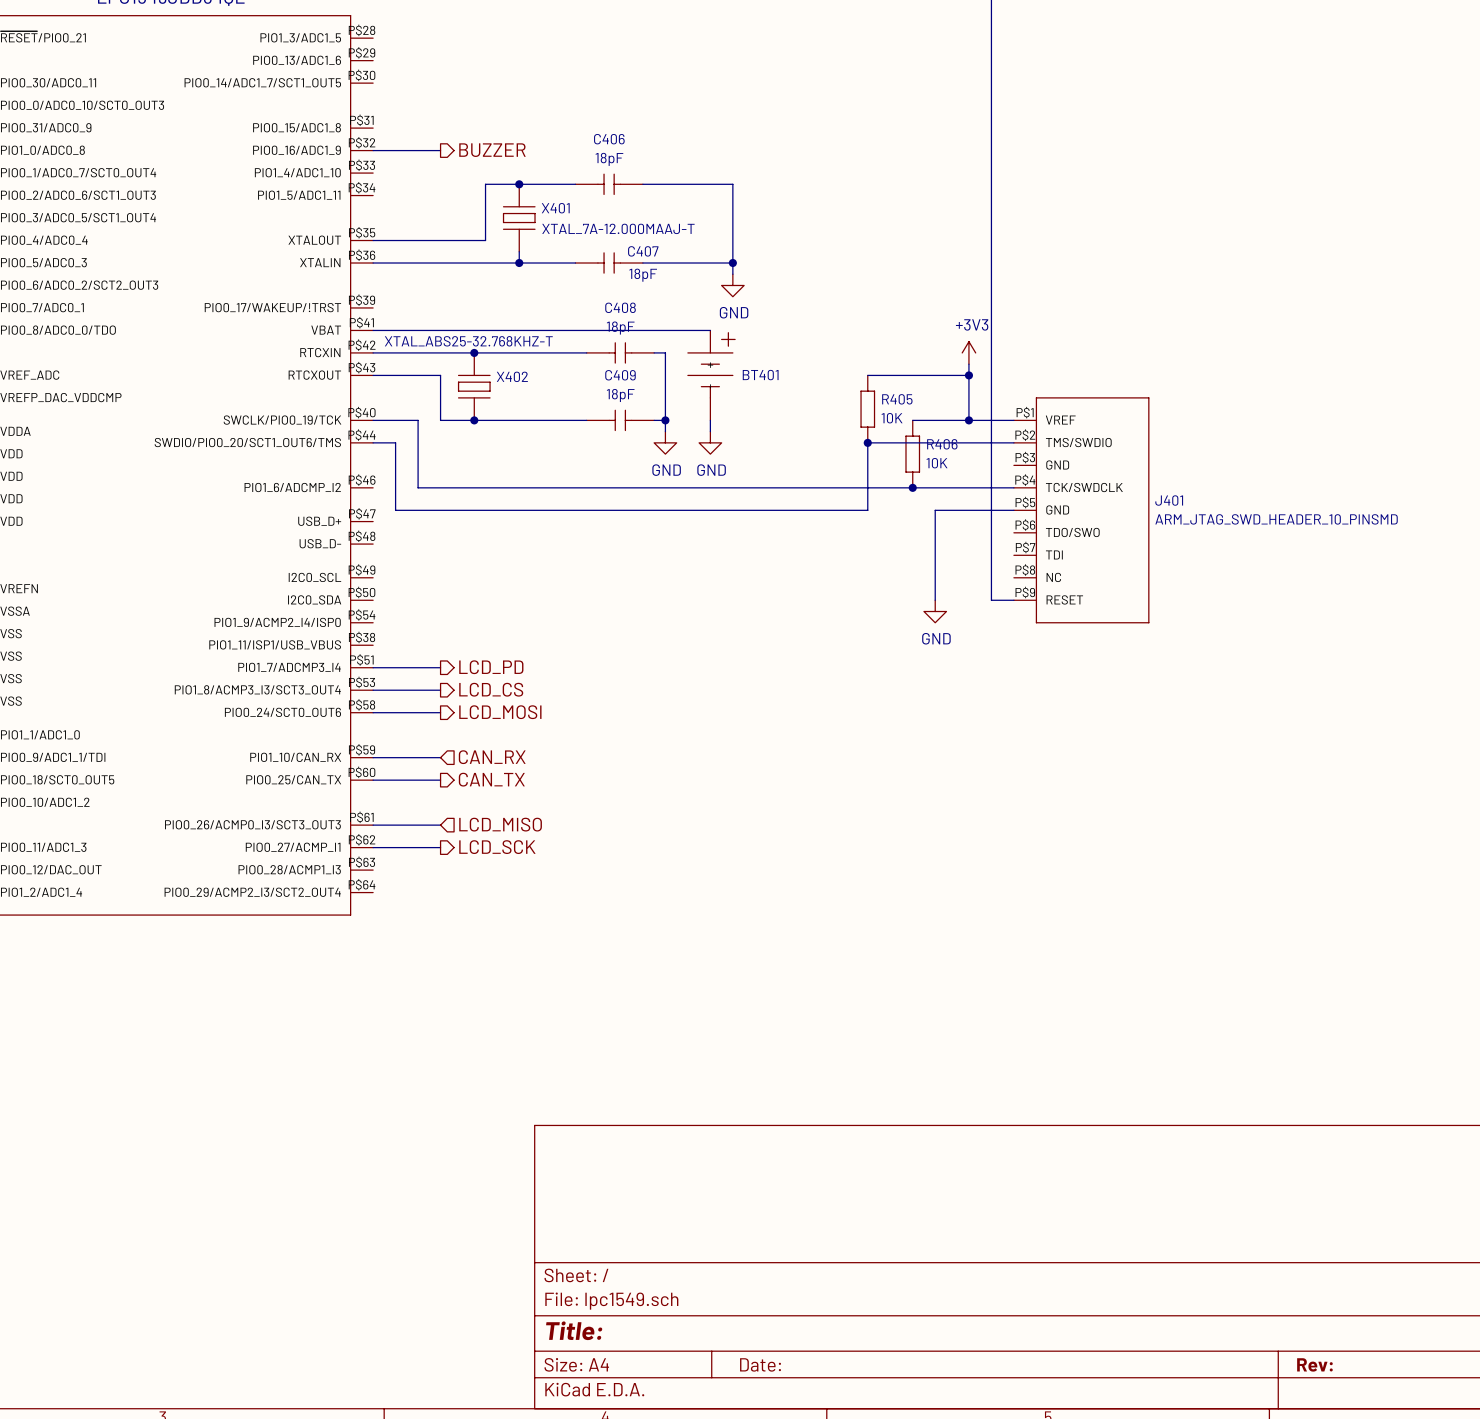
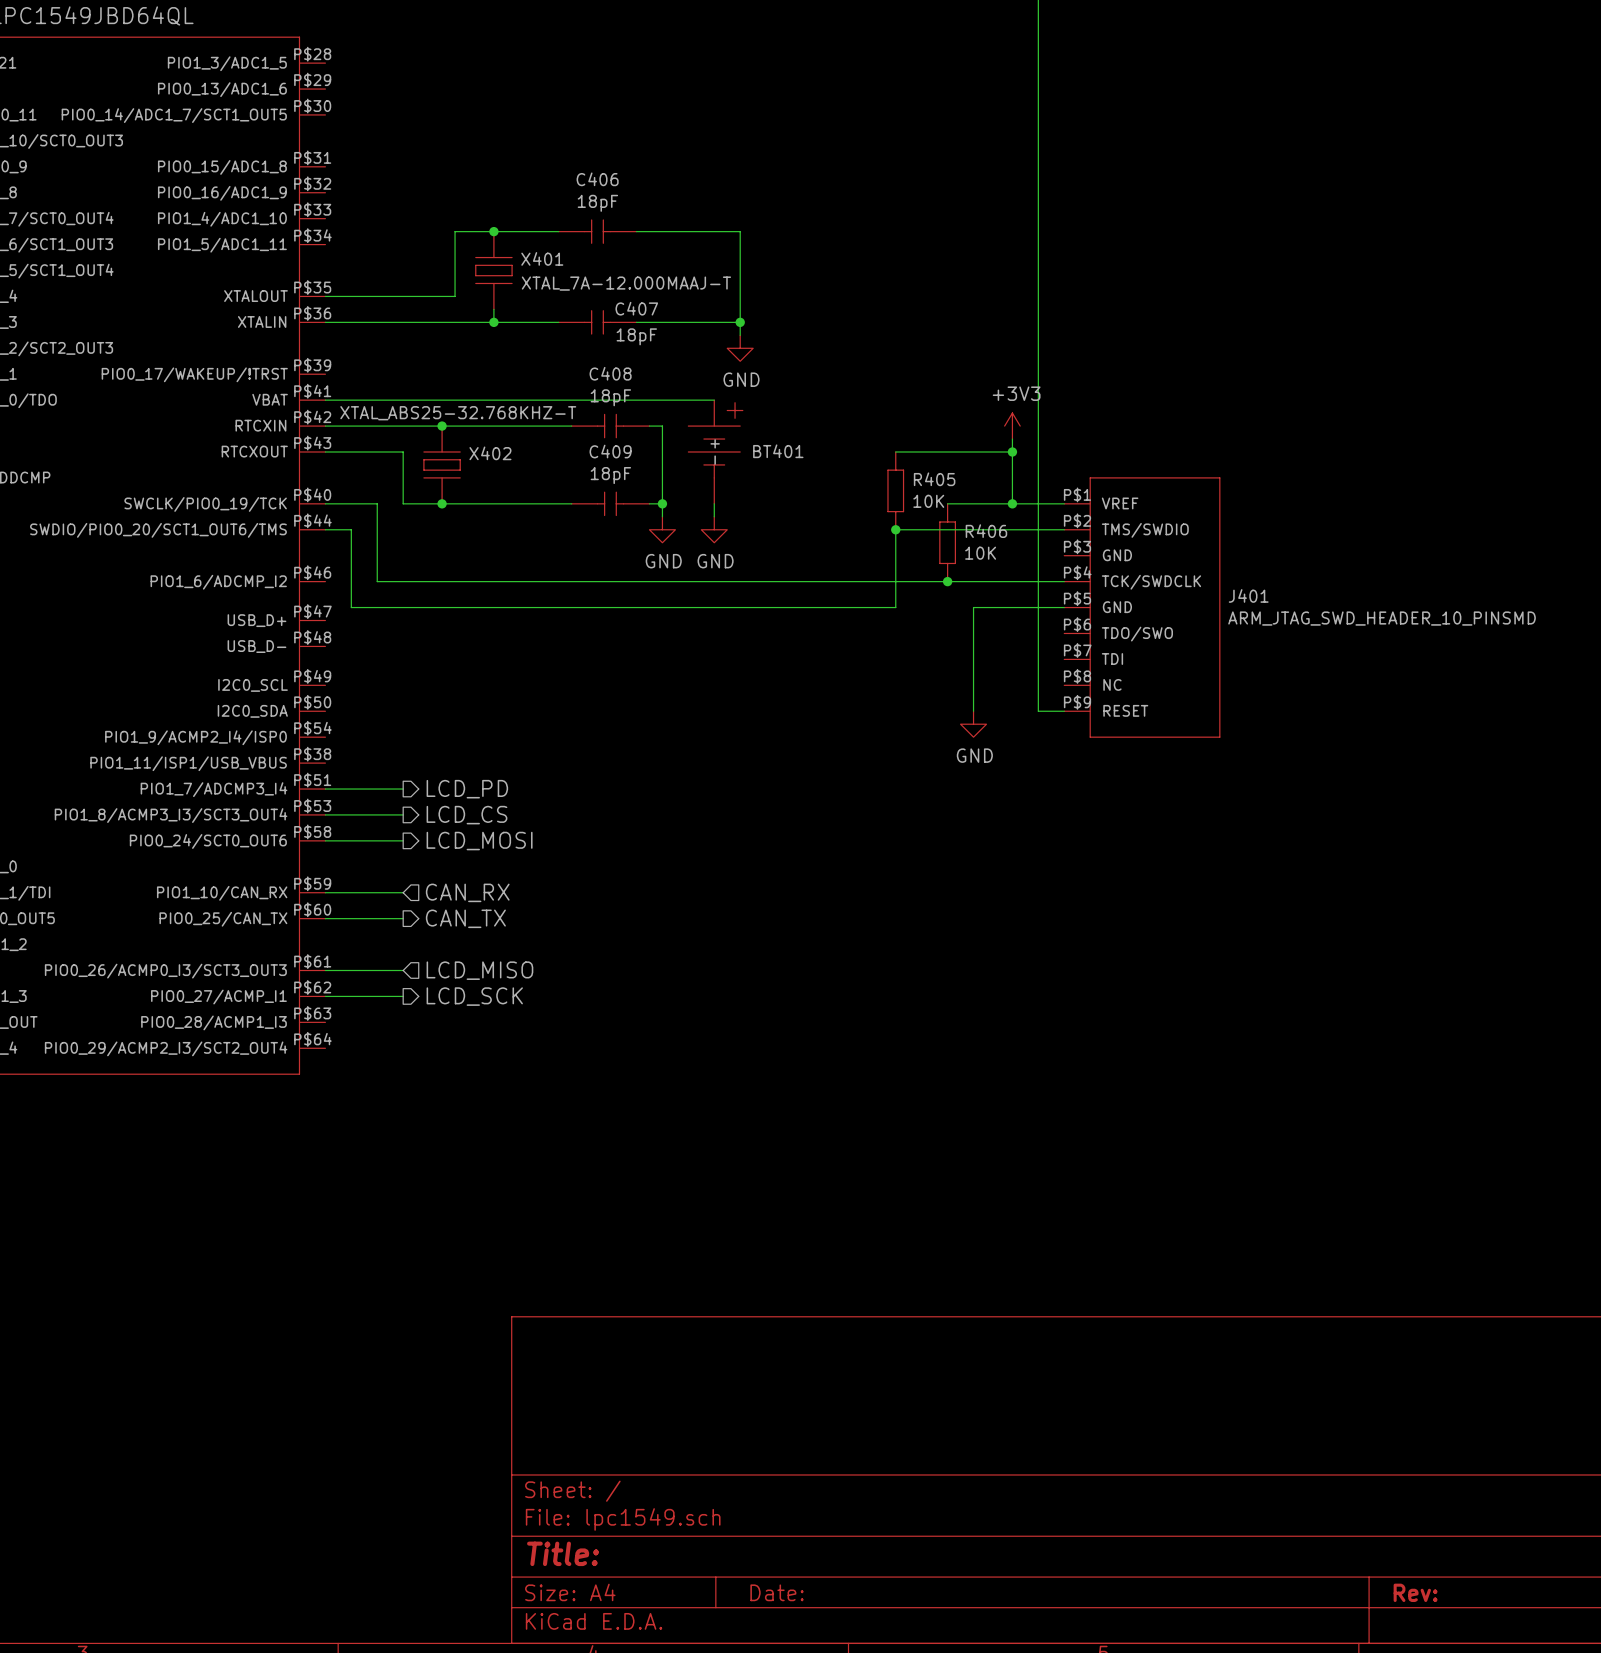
wire: (373, 150) (440, 150) -> none
hierarchical label: BUZZER (492, 150) -> none

